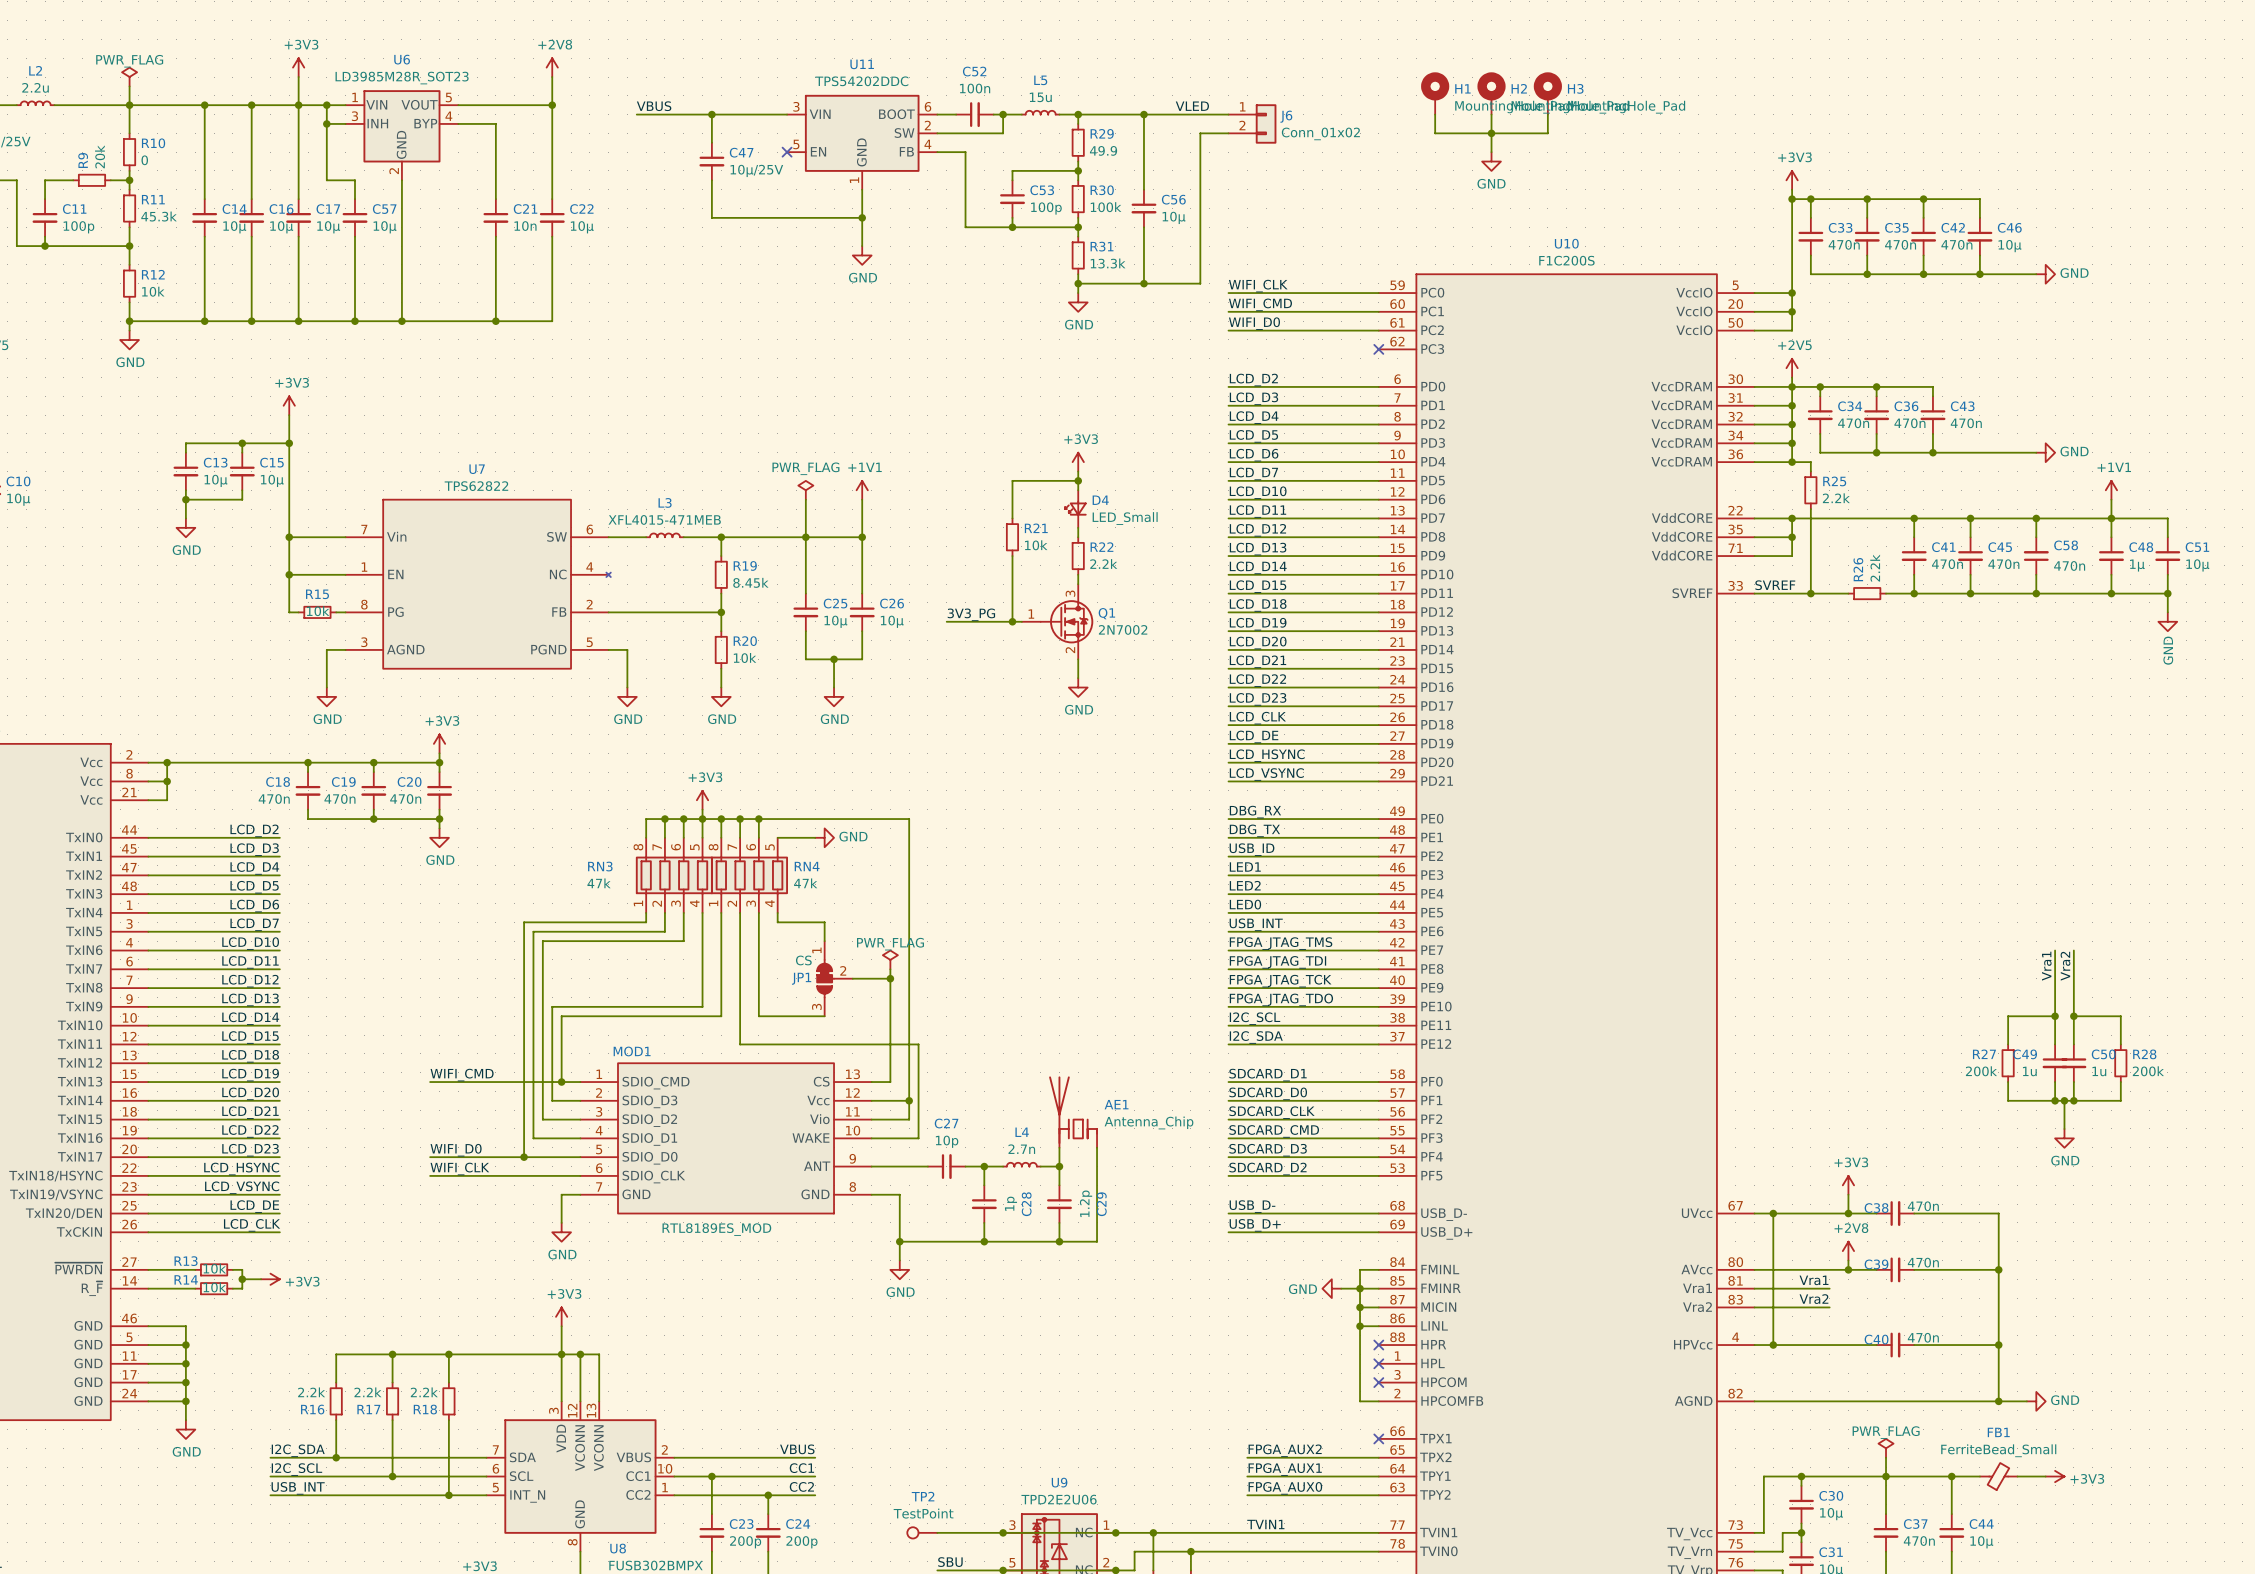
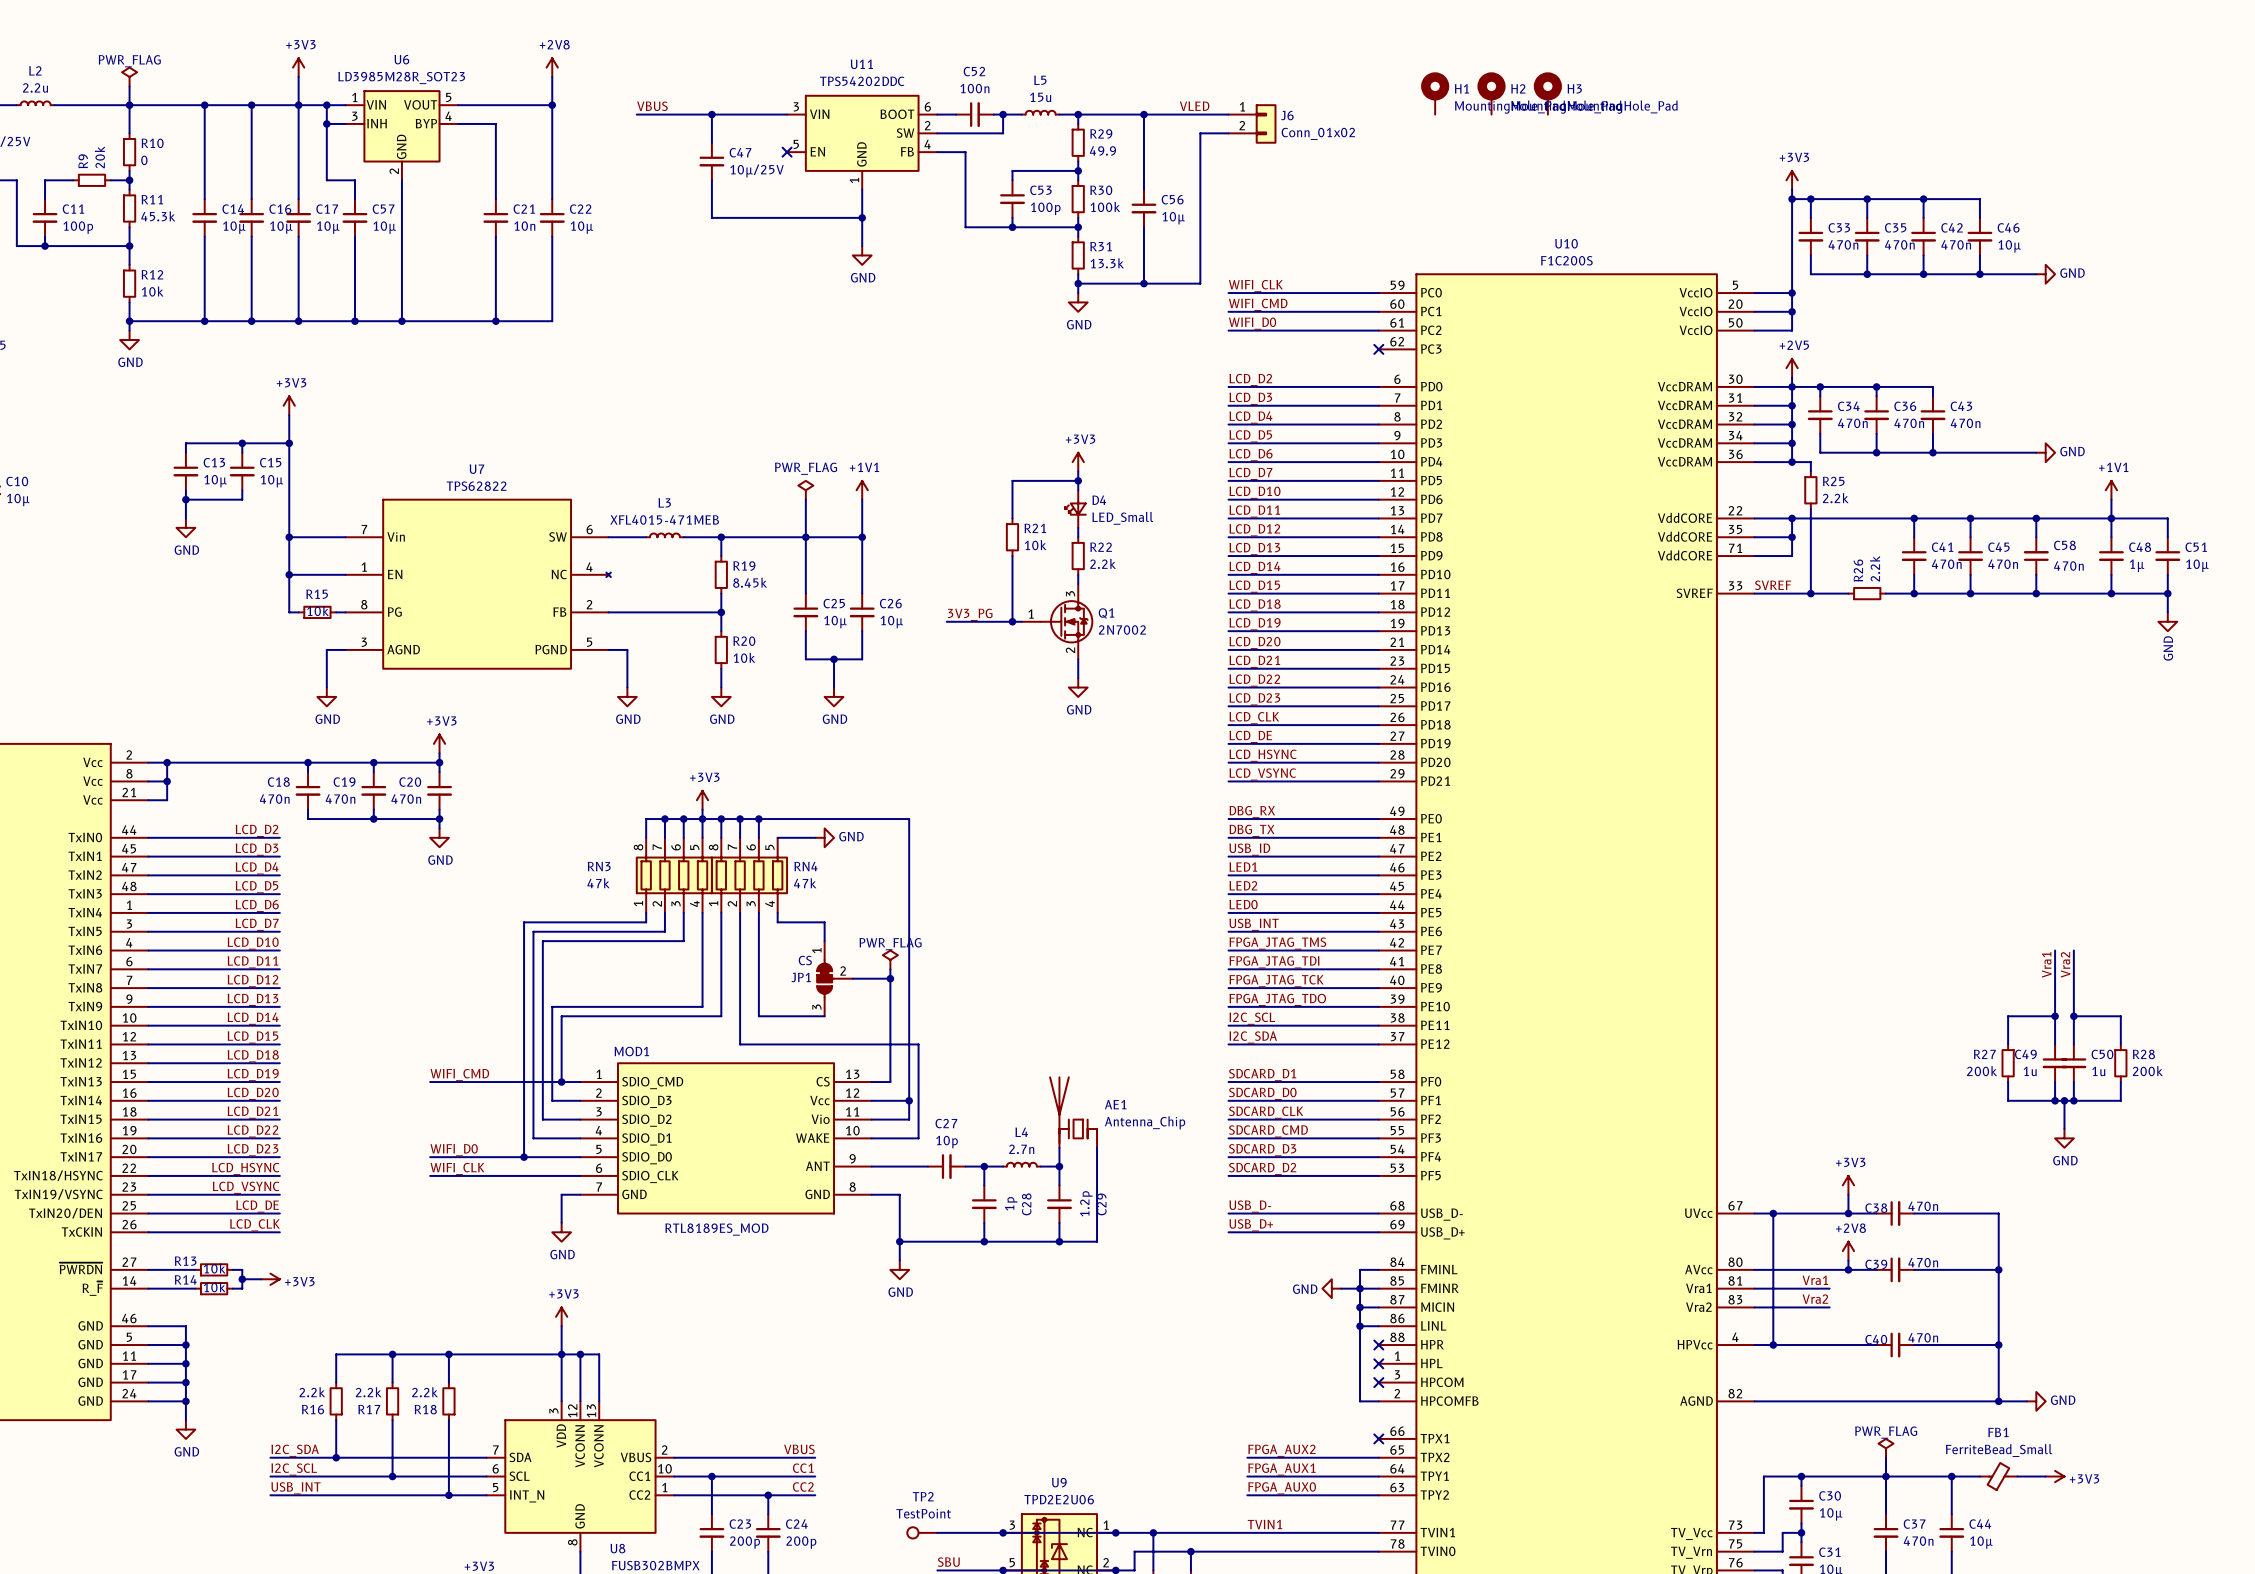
wire: (1435, 114) (1435, 133) (1547, 133) (1547, 114) -> none
wire: (1491, 114) (1491, 152) -> none
junction: (1491, 133) -> none
power symbol: GND (1491, 161) -> none

